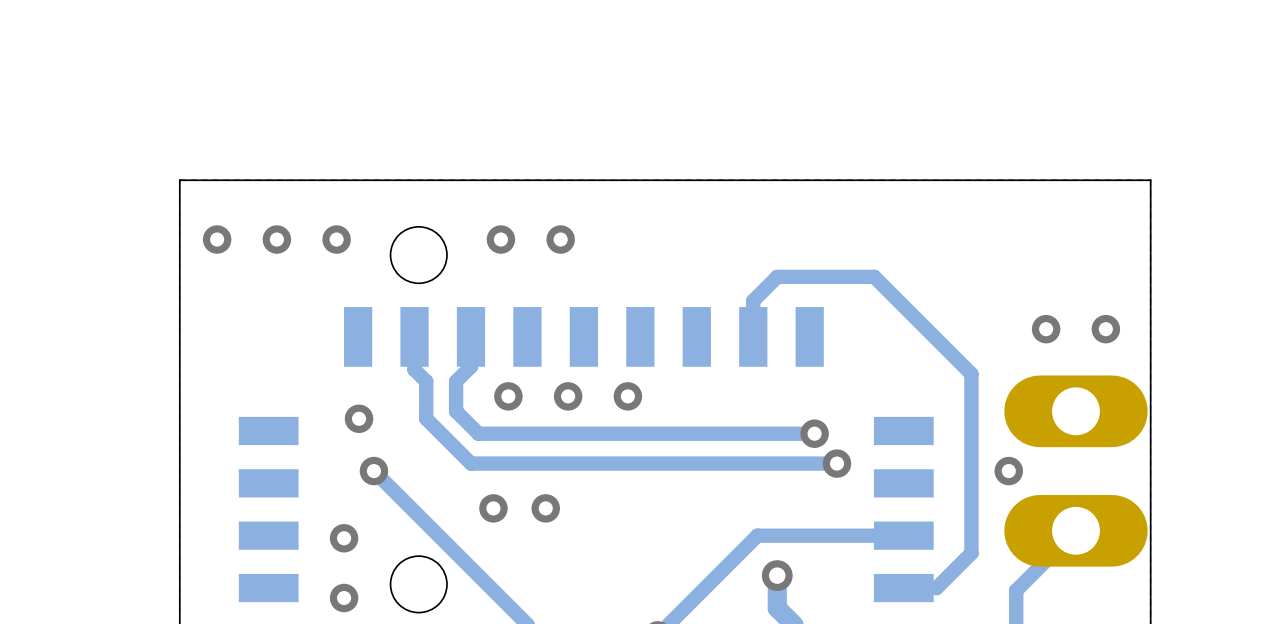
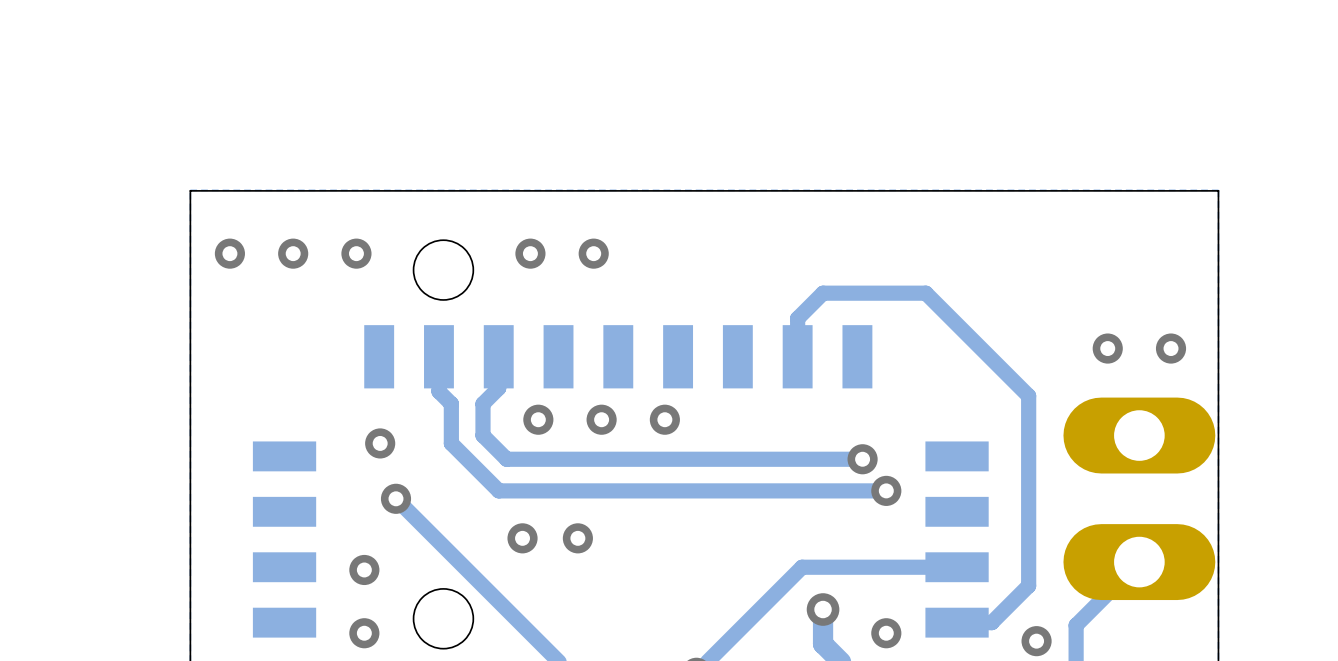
via: (1008, 471) -> none
via: none -> (886, 633)
via: none -> (1036, 641)

